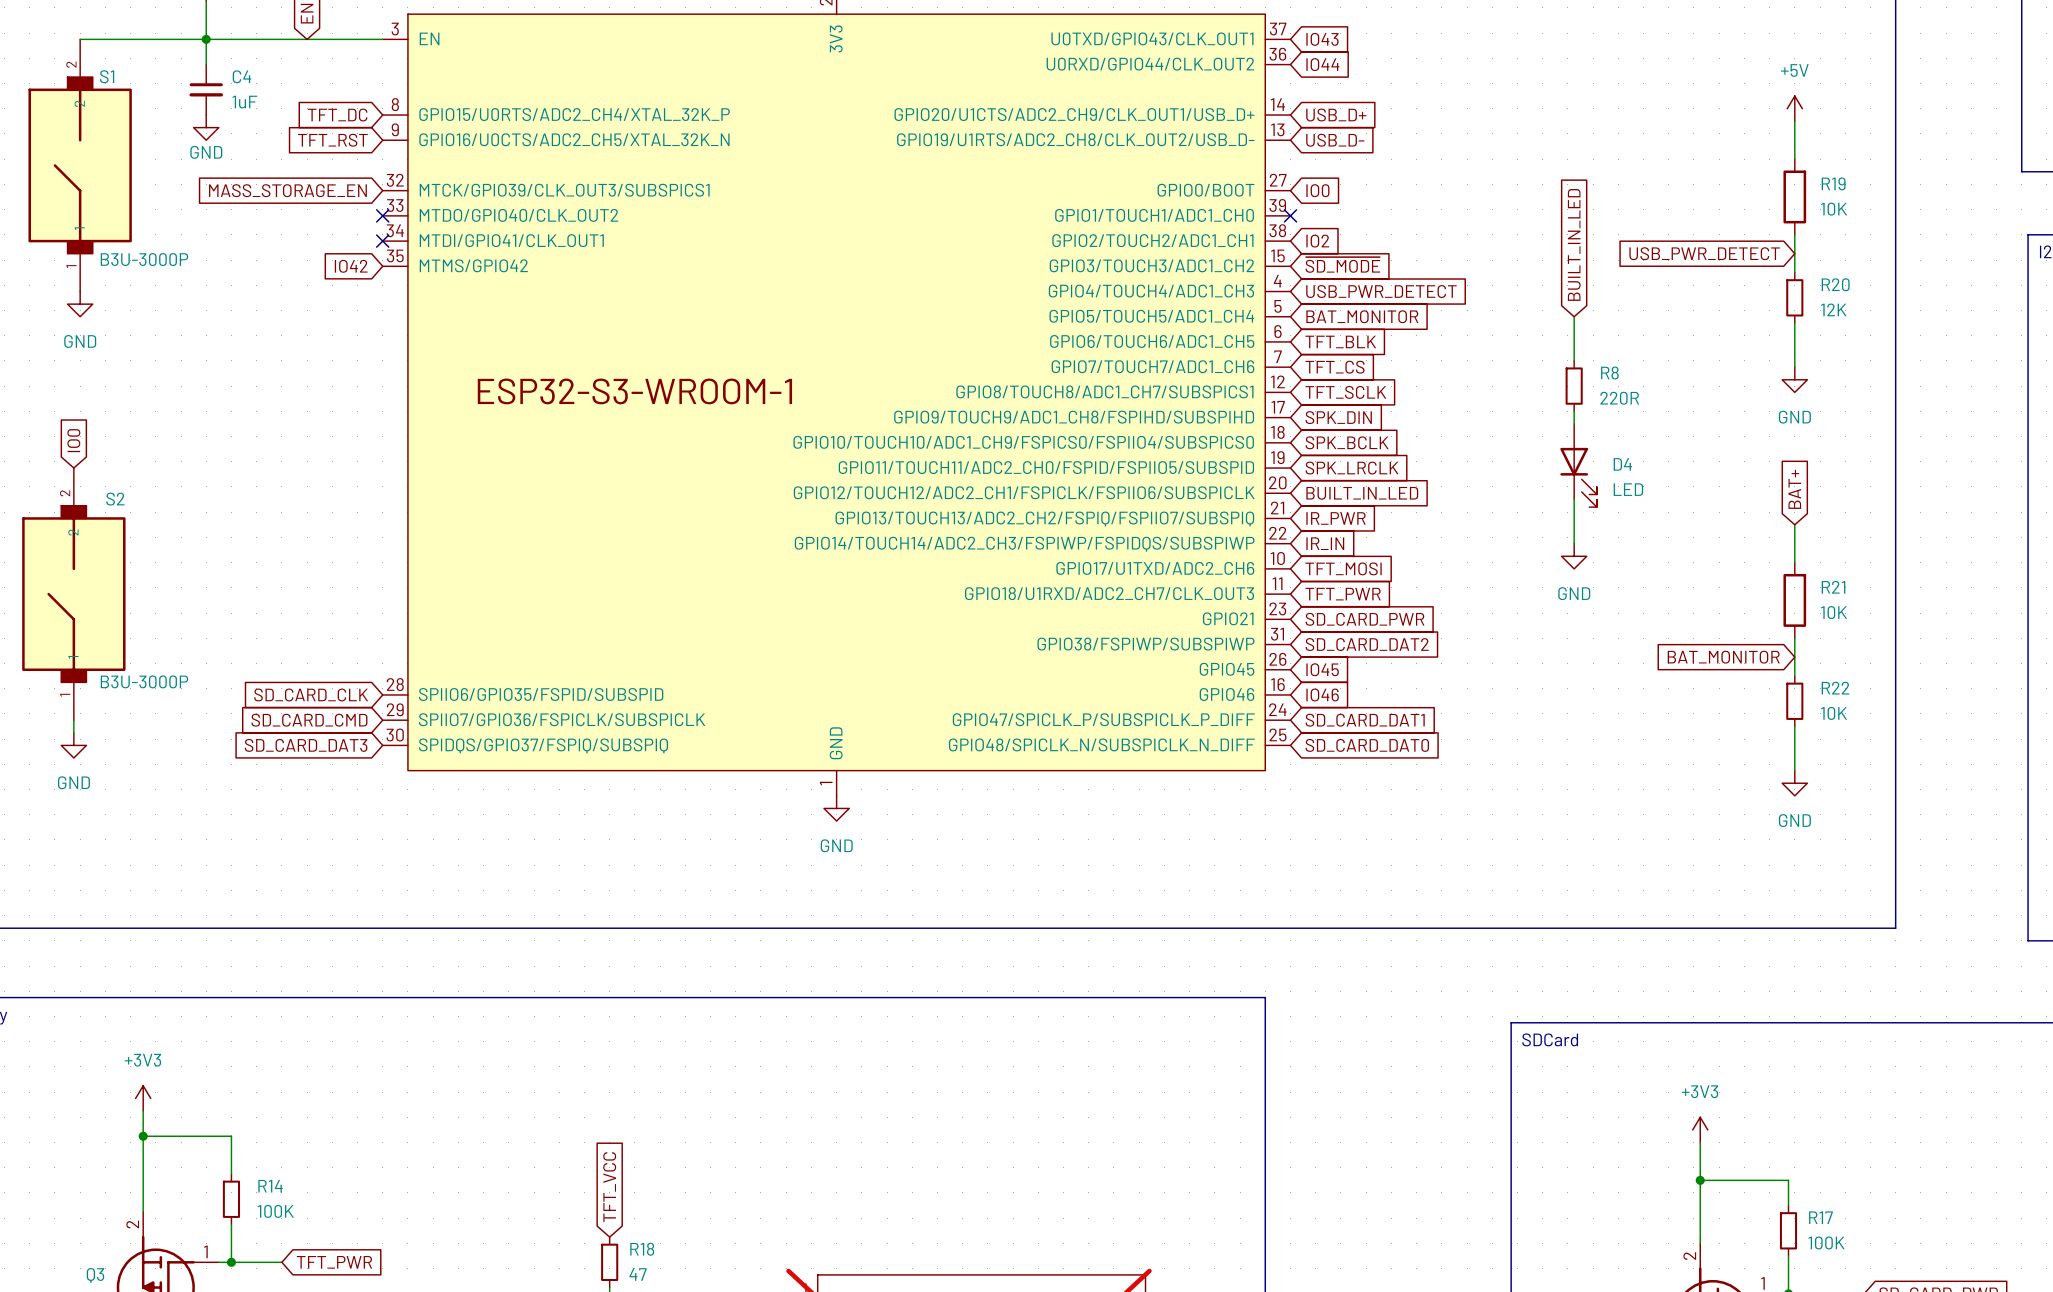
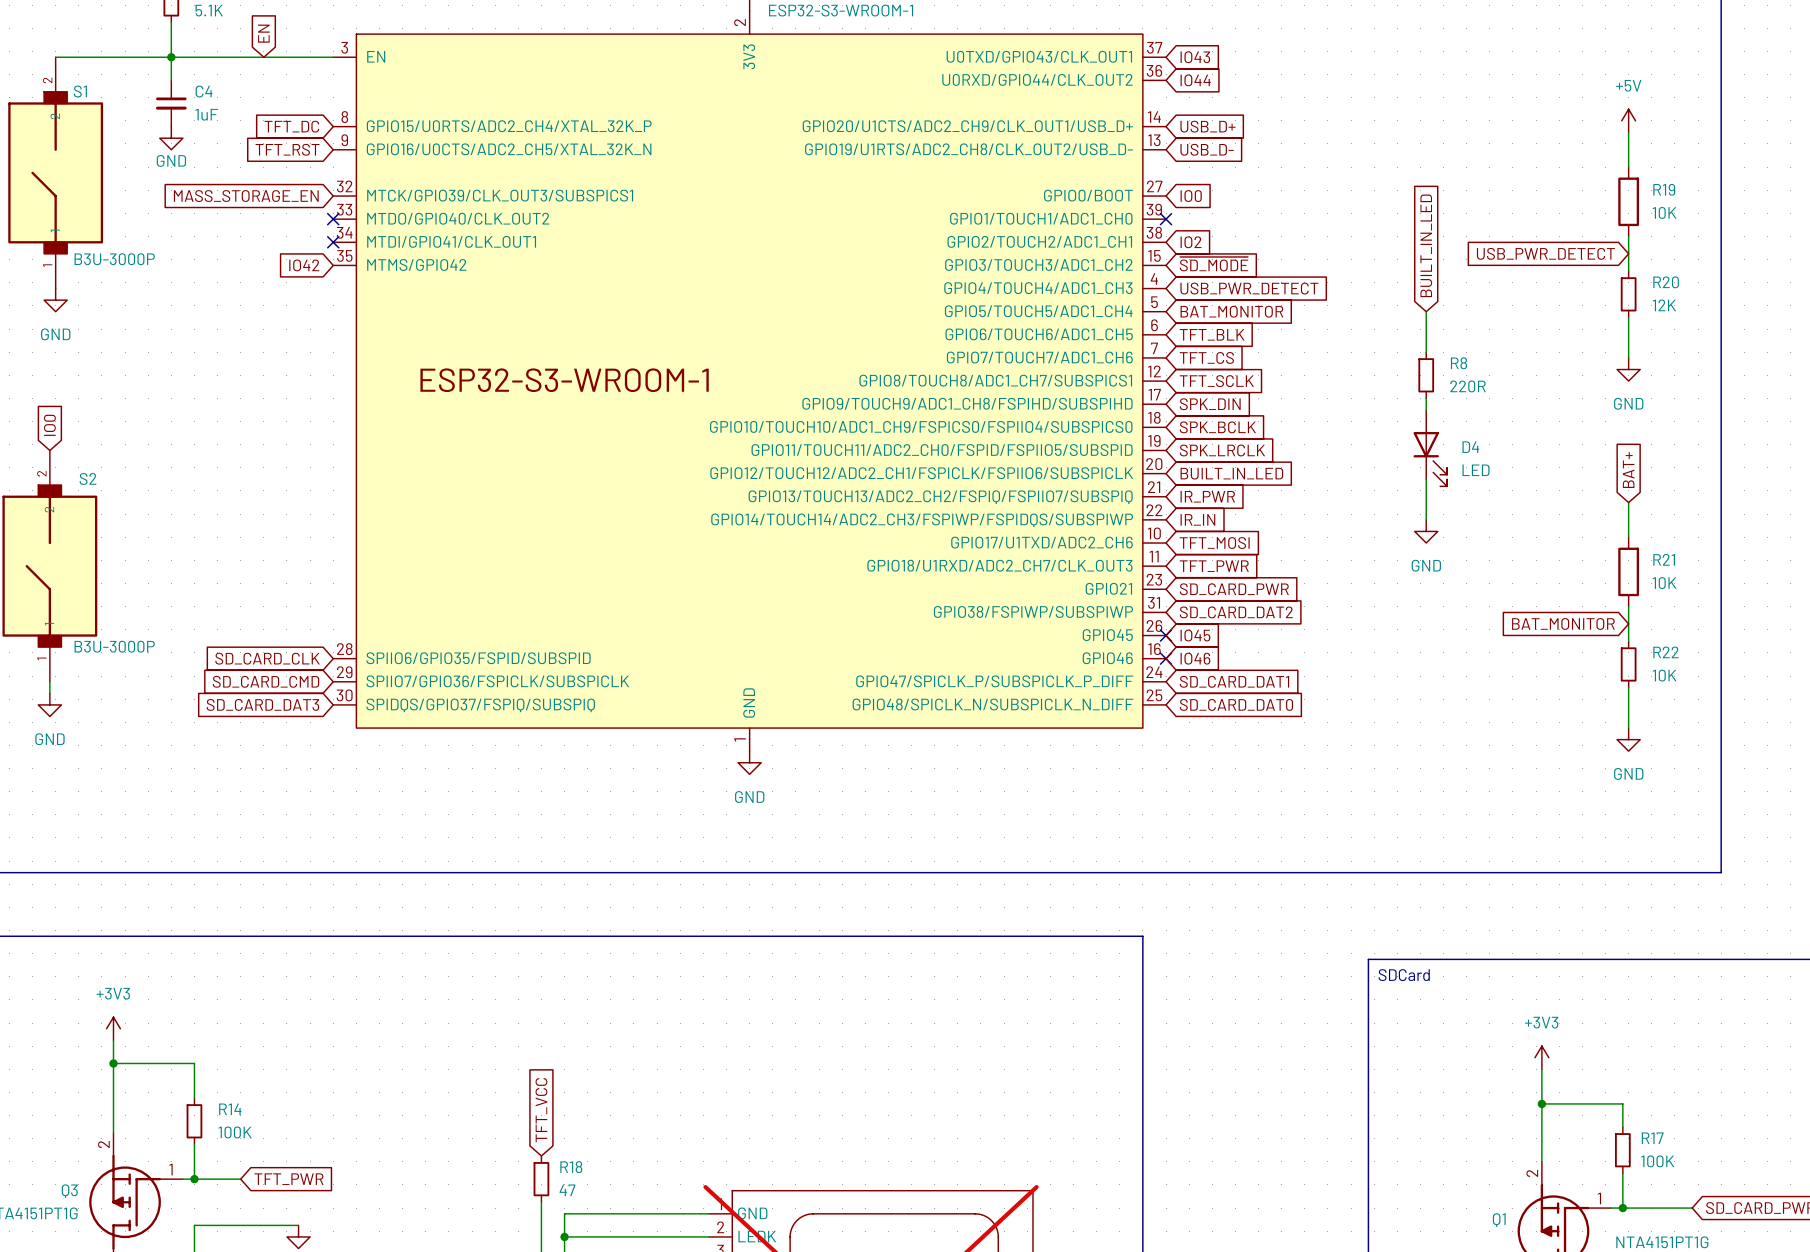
no-connect mark: none -> (1166, 635)
no-connect mark: none -> (1166, 658)

